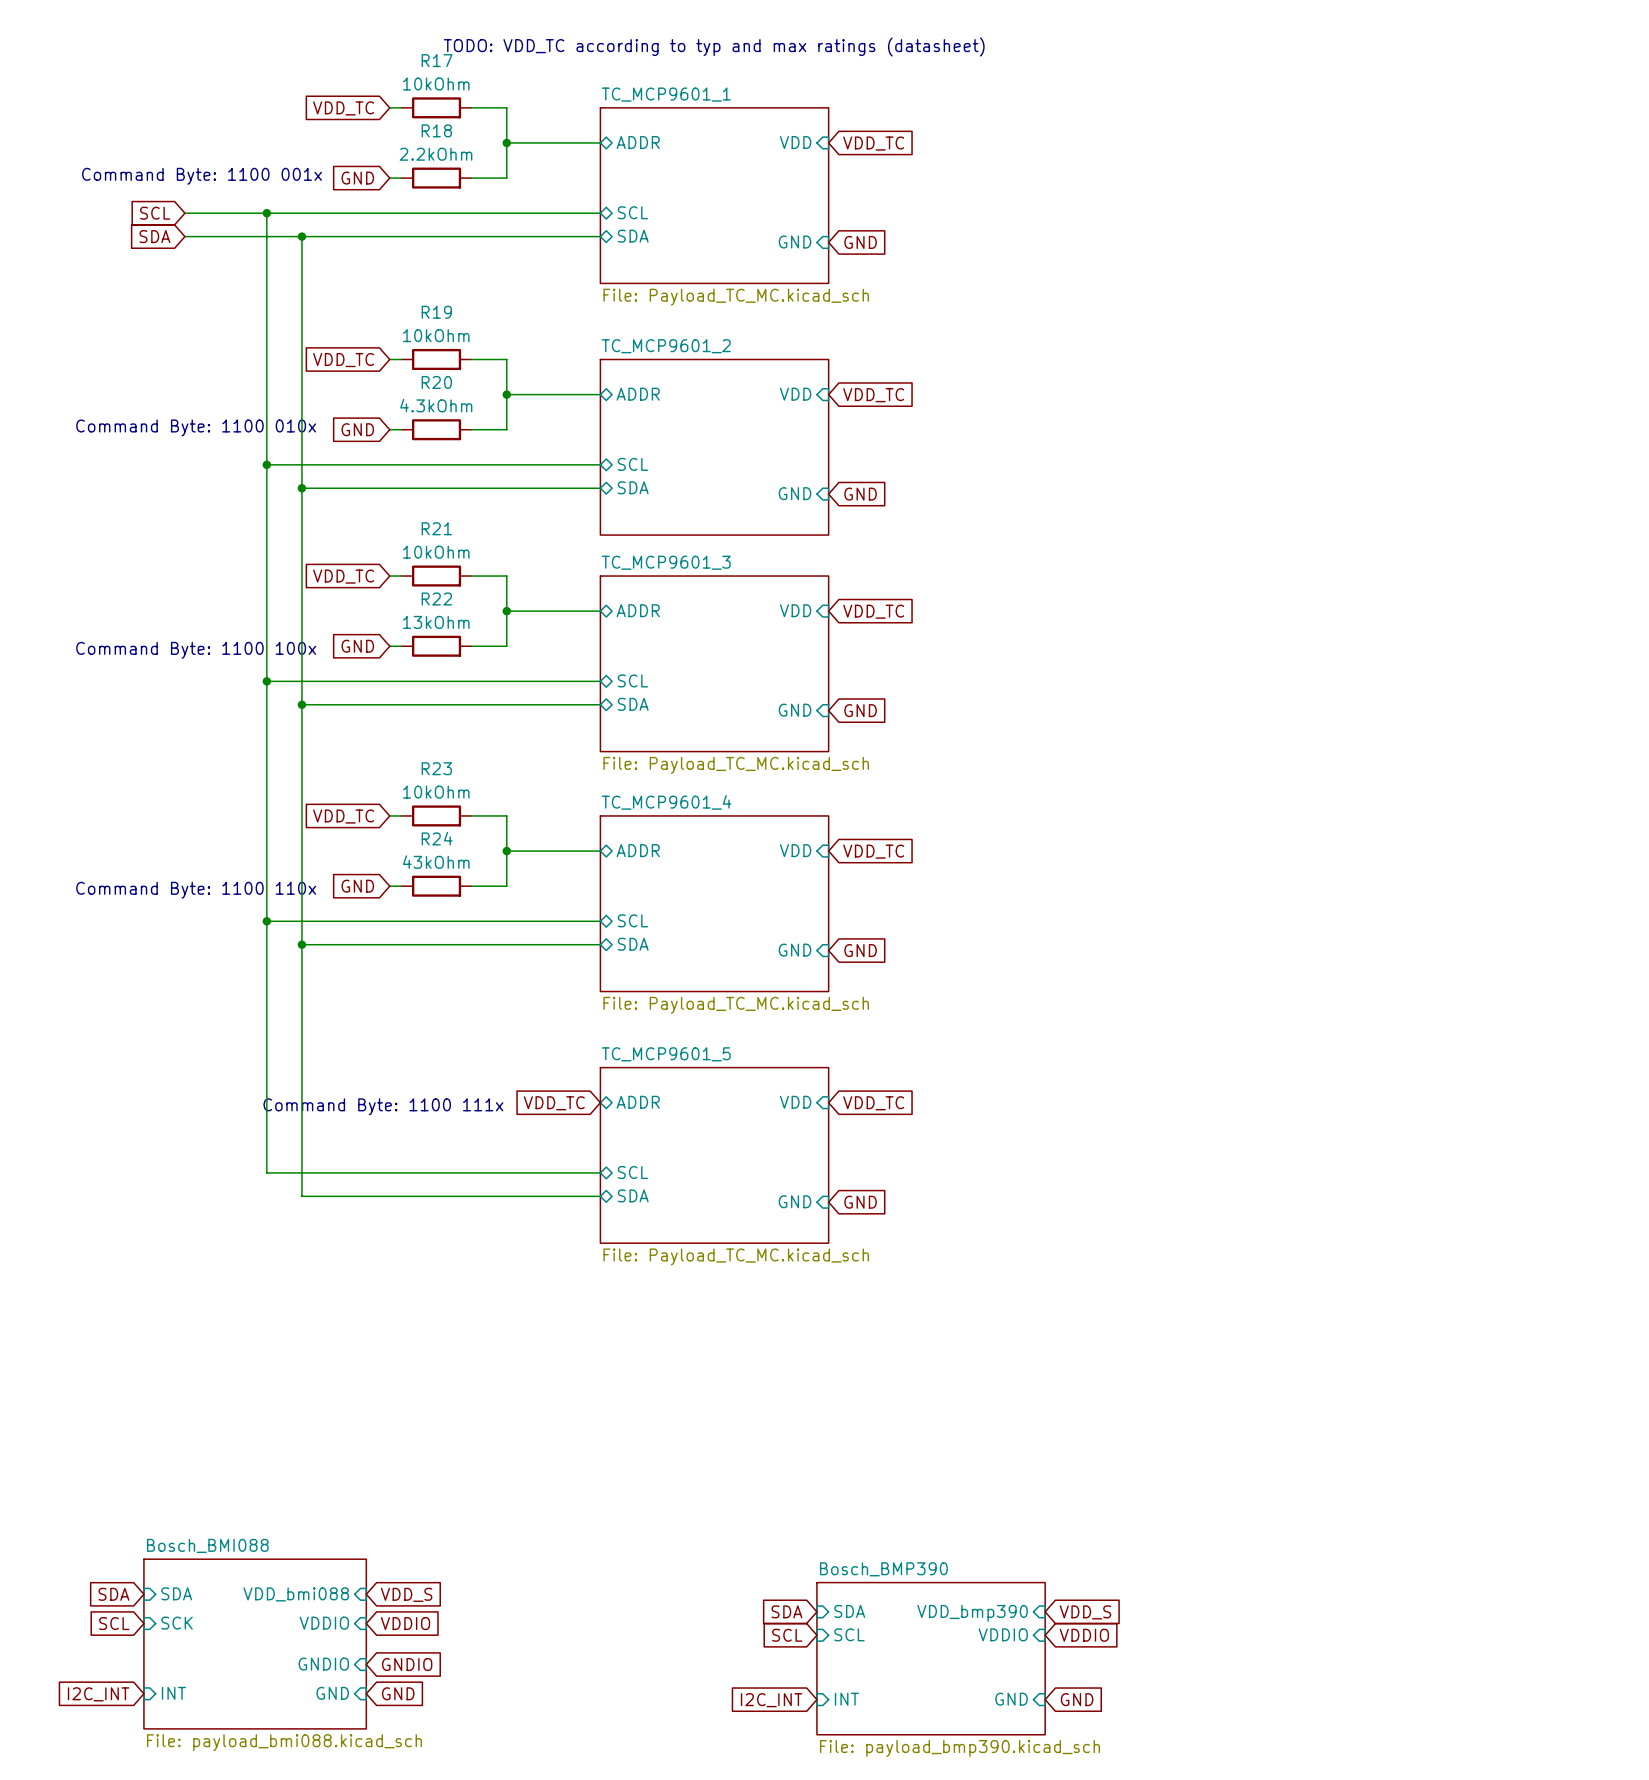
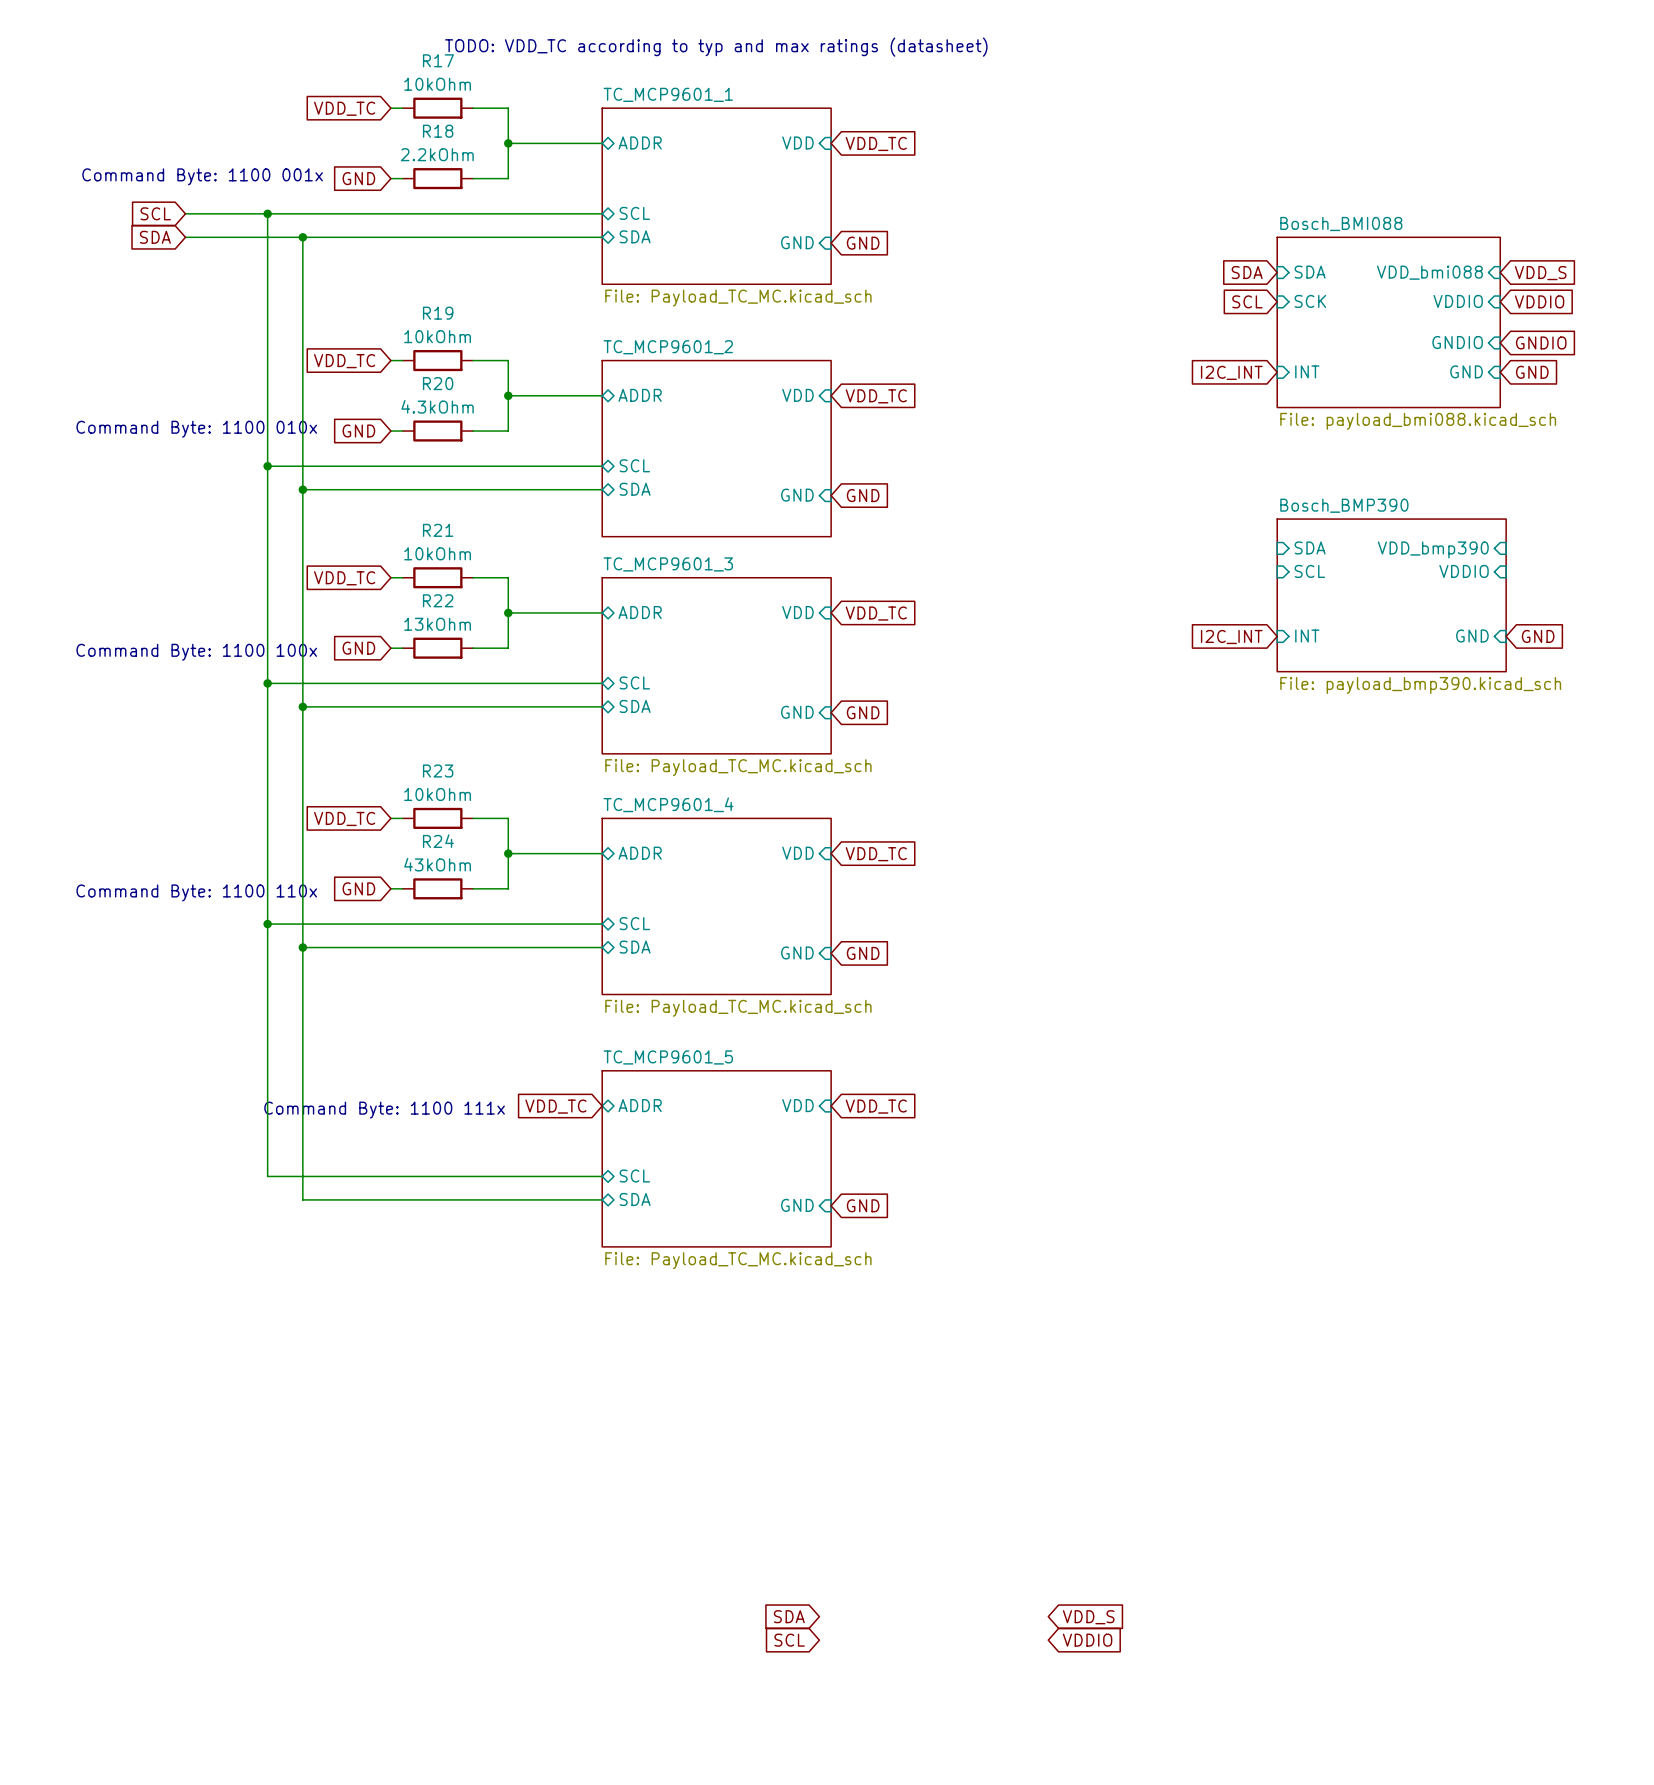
global label: none -> SDA (1247, 272)
sheet pin: none -> SDA (1310, 272)
sheet pin: none -> VDD_bmi088 (1429, 272)
global label: none -> VDD_S (1540, 273)
global label: none -> SCL (1247, 301)
sheet pin: none -> SCK (1310, 301)
sheet pin: none -> VDDIO (1458, 301)
global label: none -> VDDIO (1539, 301)
sheet pin: none -> GNDIO (1457, 342)
global label: none -> GNDIO (1541, 342)
sheet pin: none -> INT (1307, 371)
sheet pin: none -> GND (1466, 371)
global label: none -> I2C_INT (1231, 372)
global label: none -> GND (1532, 372)
sheet pin: none -> SDA (1310, 547)
sheet pin: none -> VDD_bmp390 (1433, 549)
sheet pin: none -> SCL (1309, 571)
sheet pin: none -> VDDIO (1464, 571)
sheet pin: none -> INT (1307, 636)
sheet pin: none -> GND (1472, 636)
global label: none -> GND (1538, 636)
global label: none -> I2C_INT (1231, 637)
sheet pin: SDA (176, 1593) -> none
global label: SDA (113, 1594) -> none
sheet pin: VDD_bmi088 (296, 1594) -> none
global label: VDD_S (406, 1594) -> none
sheet pin: SDA (849, 1611) -> none
sheet pin: VDD_bmp390 (972, 1613) -> none
global label: SCL (114, 1623) -> none
sheet pin: SCK (177, 1623) -> none
sheet pin: VDDIO (324, 1623) -> none
global label: VDDIO (405, 1623) -> none
sheet pin: SCL (849, 1634) -> none
sheet pin: VDDIO (1003, 1634) -> none
sheet Bosch_BMI088 position: (255, 1644) -> (1388, 322)
sheet Bosch_BMP390 position: (931, 1658) -> (1391, 595)
sheet pin: GNDIO (323, 1664) -> none
global label: GNDIO (407, 1664) -> none
sheet pin: INT (173, 1693) -> none
sheet pin: GND (332, 1693) -> none
global label: GND (398, 1693) -> none
global label: I2C_INT (98, 1694) -> none
sheet pin: INT (846, 1699) -> none
sheet pin: GND (1011, 1699) -> none
global label: GND (1077, 1699) -> none
global label: I2C_INT (771, 1700) -> none

